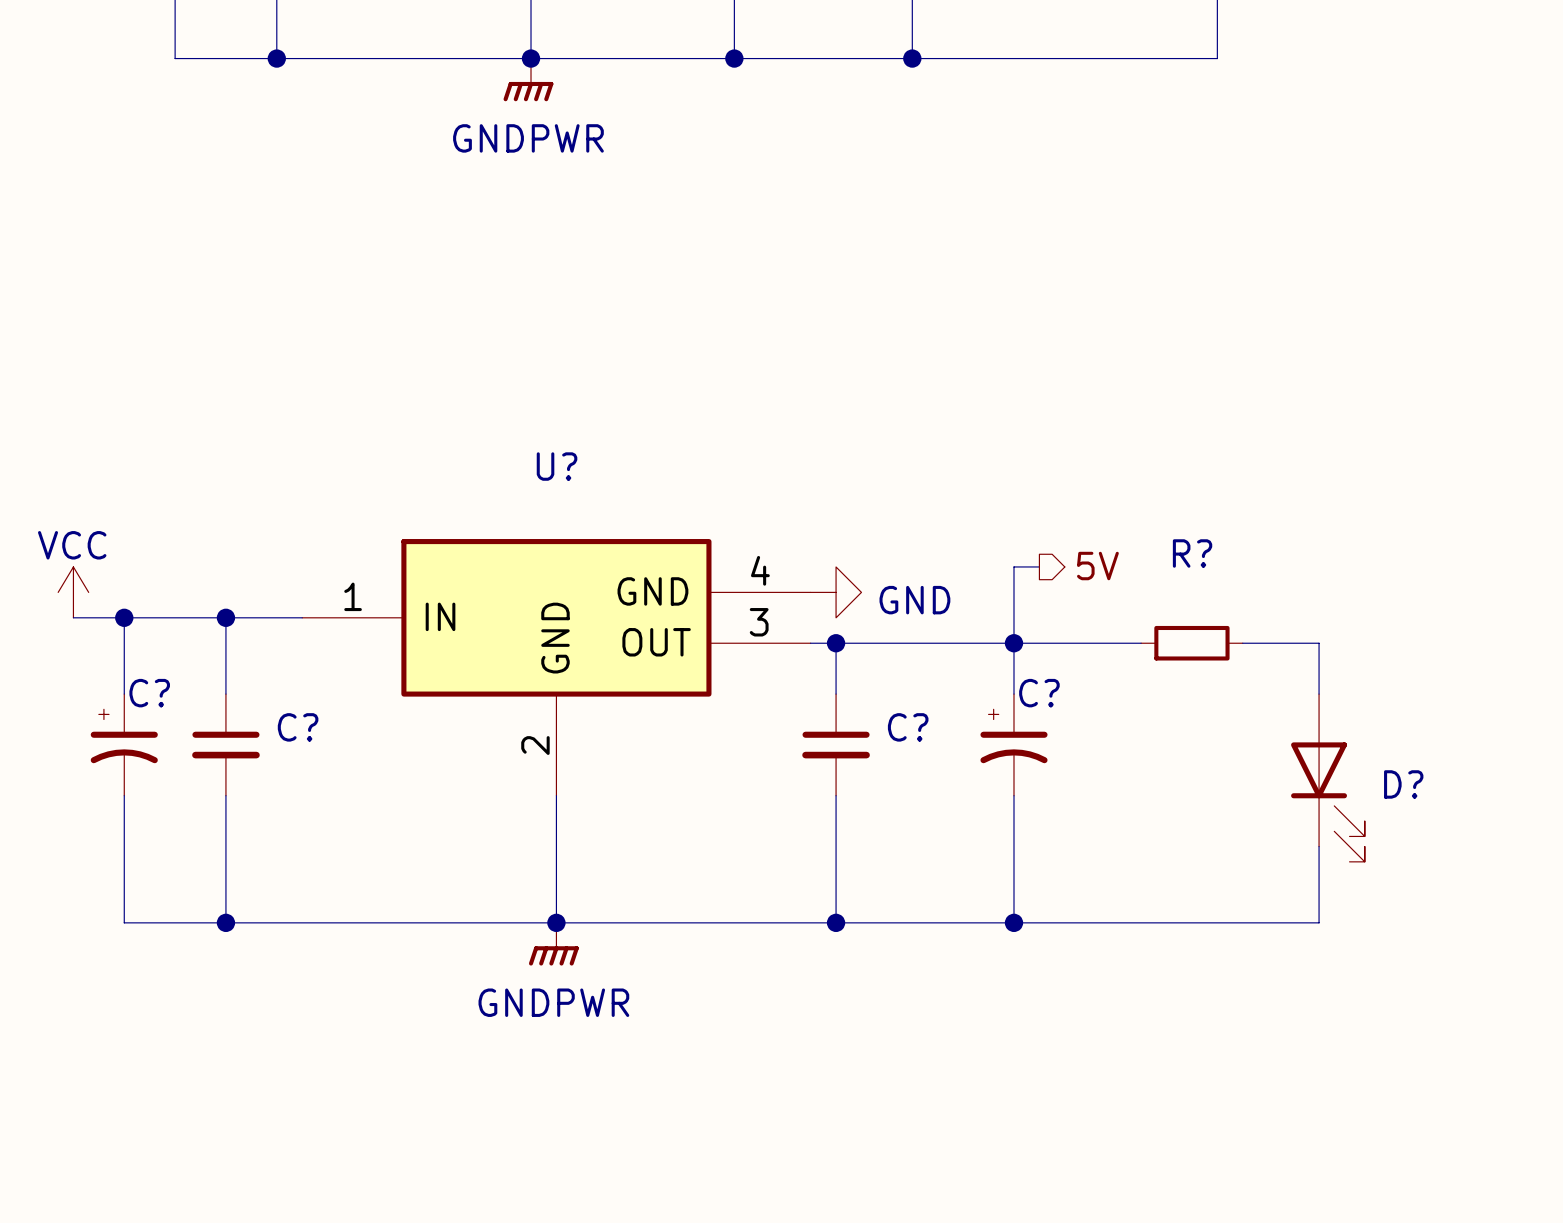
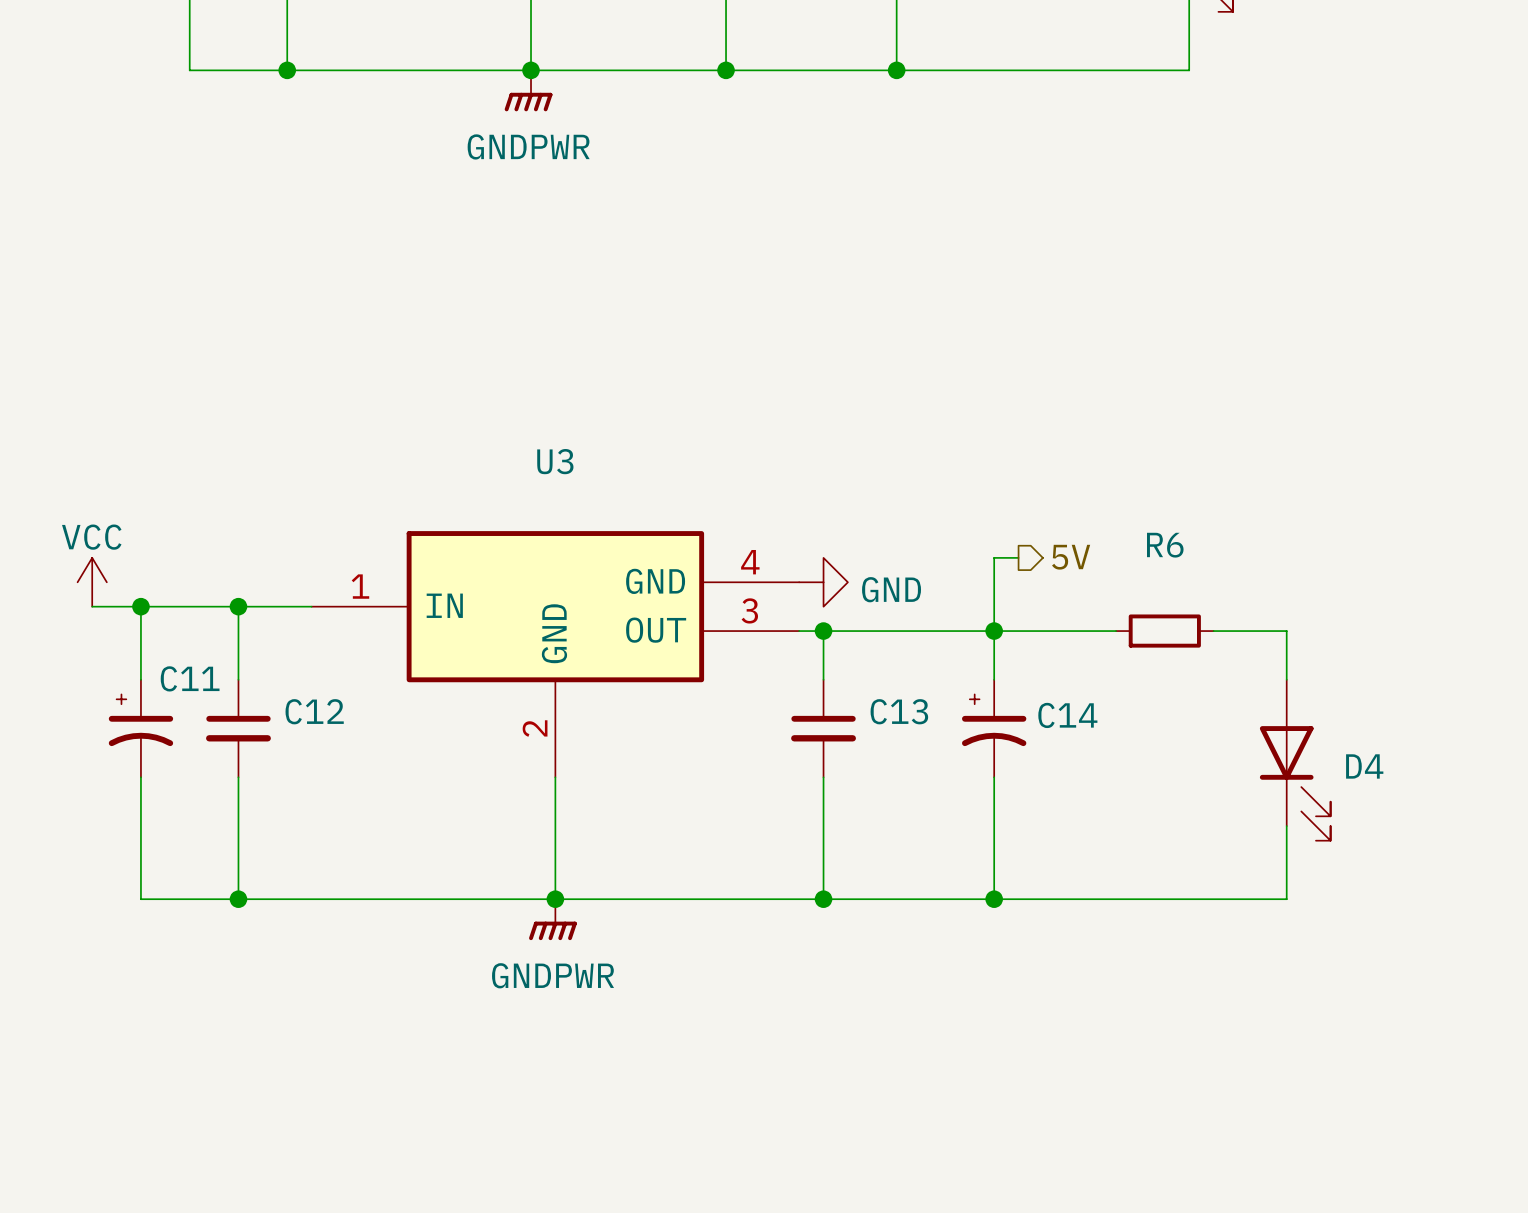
U? name: U? (557, 466) -> U3 (555, 461)
R? name: R? (1192, 553) -> R6 (1165, 545)
C? name: C? (149, 693) -> C11 (190, 678)
C? name: C? (1039, 693) -> C14 (1067, 715)
C? name: C? (298, 727) -> C12 (314, 711)
C? name: C? (908, 727) -> C13 (899, 711)
D? name: D? (1403, 784) -> D4 (1364, 766)

